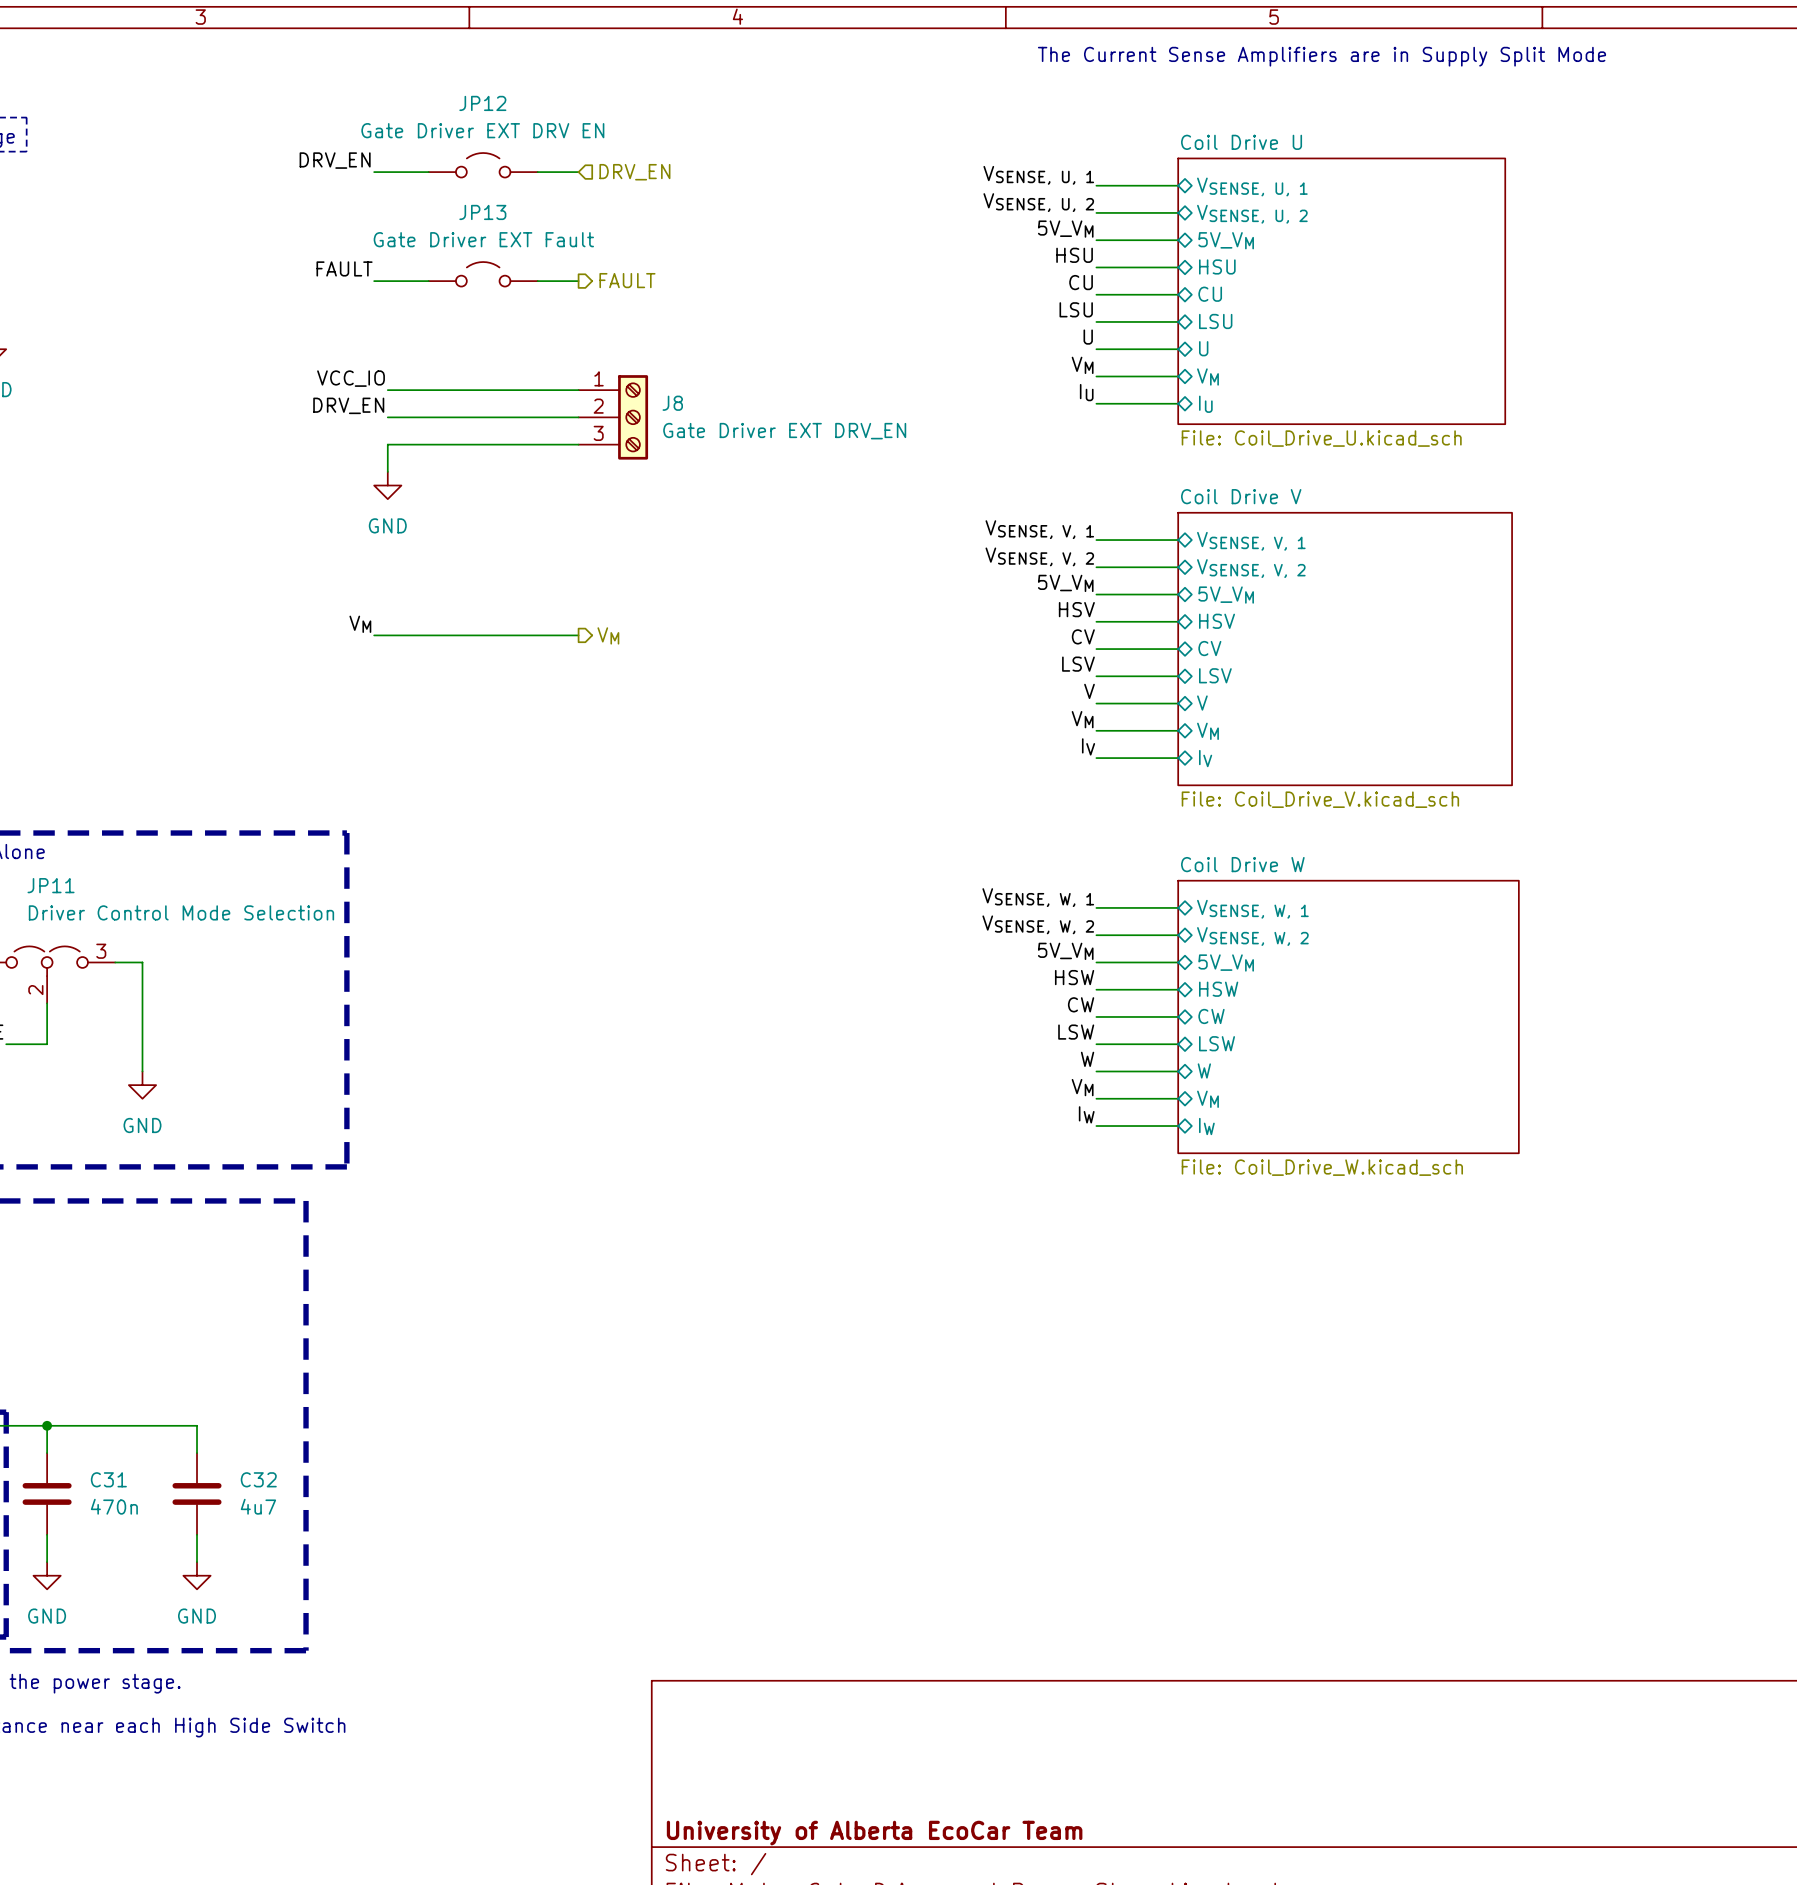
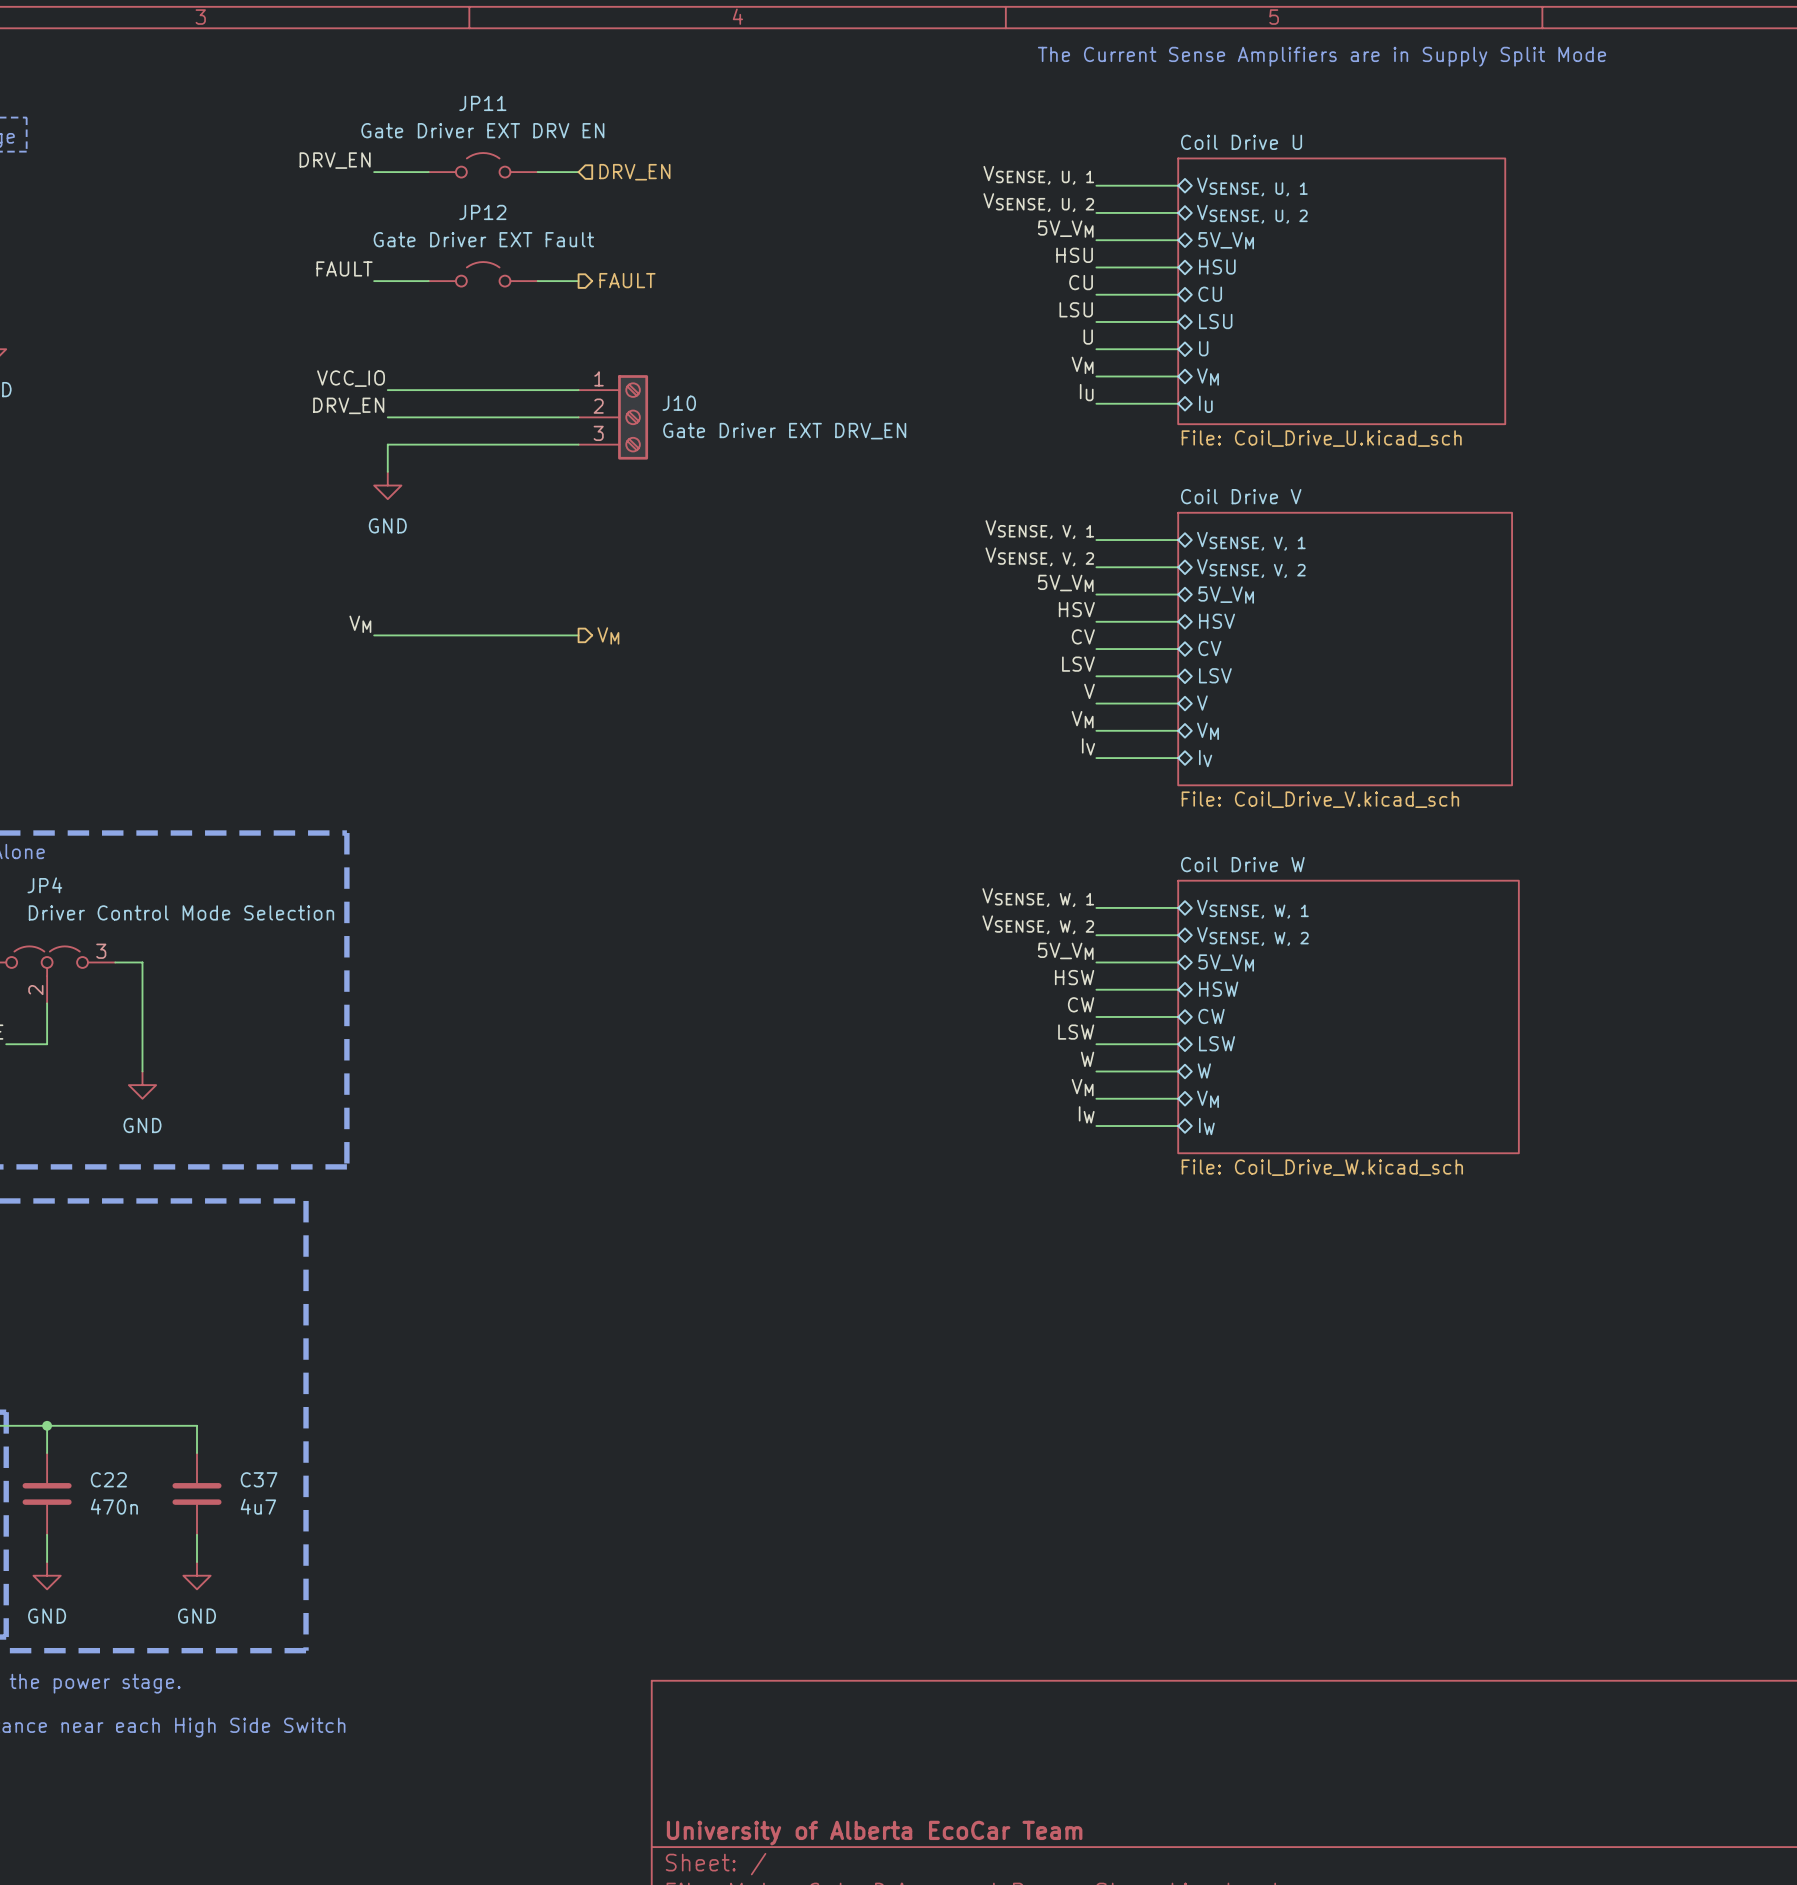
JP12 name: JP12 (482, 103) -> JP11 (482, 103)
JP13 name: JP13 (482, 212) -> JP12 (482, 212)
J8 name: J8 (672, 403) -> J10 (679, 403)
JP11 name: JP11 (51, 885) -> JP4 (44, 885)
C31 name: C31 (108, 1479) -> C22 (108, 1479)
C32 name: C32 (258, 1479) -> C37 (259, 1479)

